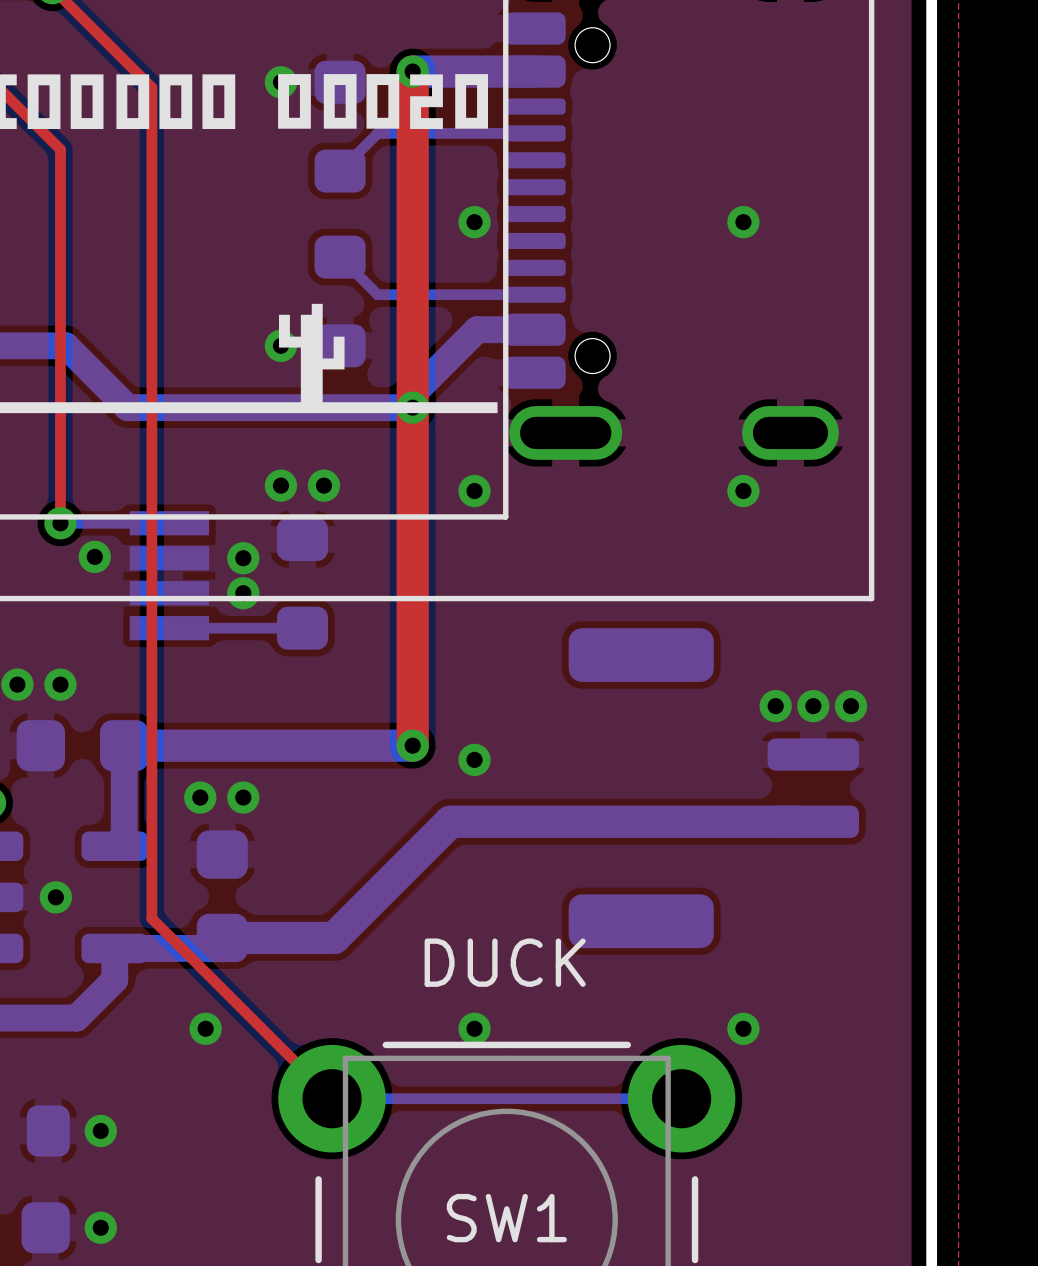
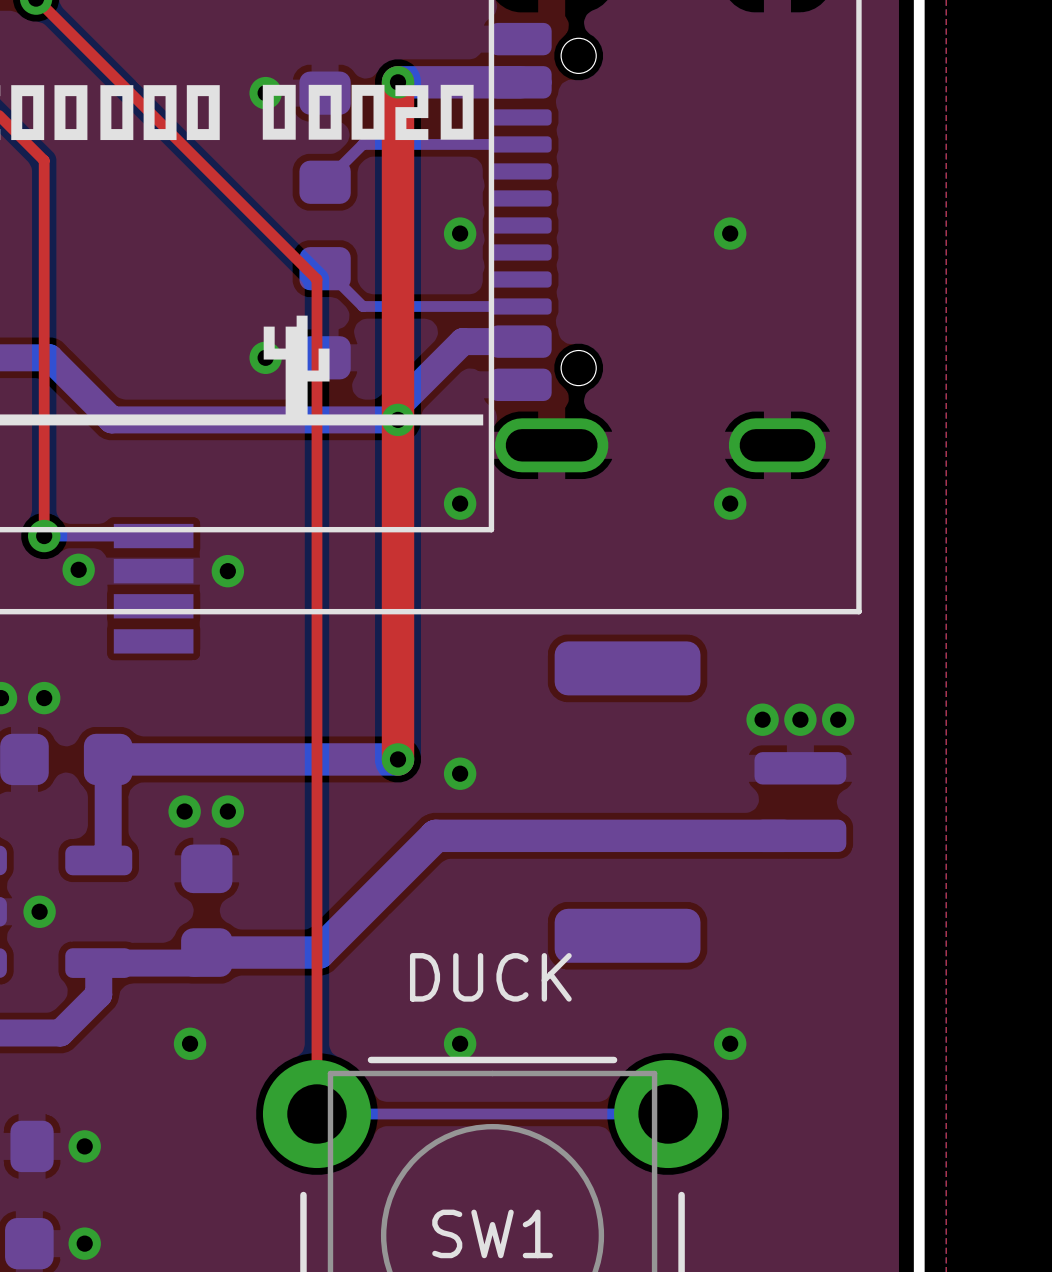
top track: (151, 87) (151, 918) (332, 1098) -> (136, 98) (316, 279) (316, 1114)
via: (280, 485) -> none
via: (323, 485) -> none
part: (302, 583) -> none
via: (243, 593) -> none
bottom track: (169, 628) (302, 628) -> none

